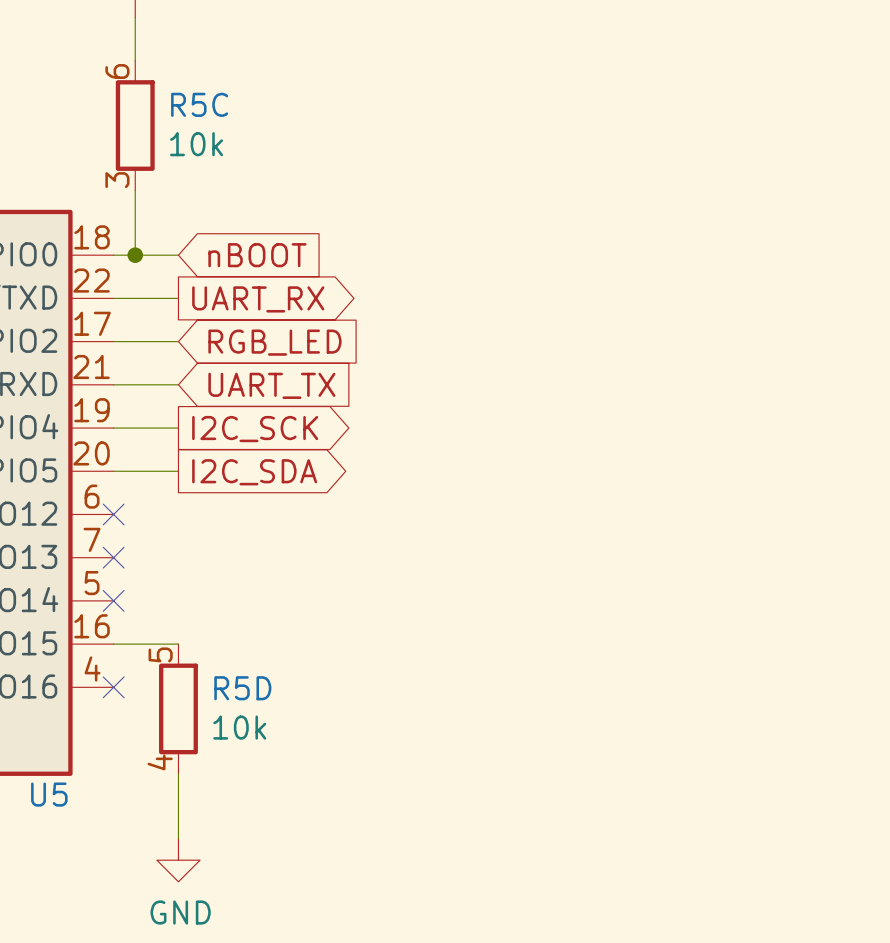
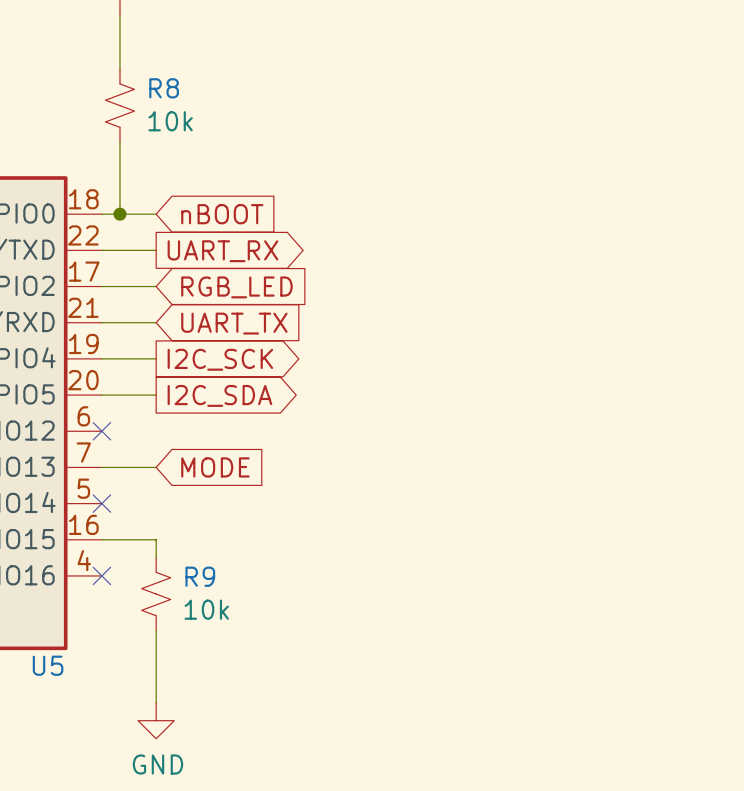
R5C: 10k (135, 125) -> none
R8: none -> 10k (119, 105)
wire: none -> (101, 467) (156, 467)
no-connect mark: (113, 557) -> none
global label: none -> MODE (215, 467)
R5D: 10k (178, 708) -> none
R9: none -> 10k (156, 594)

